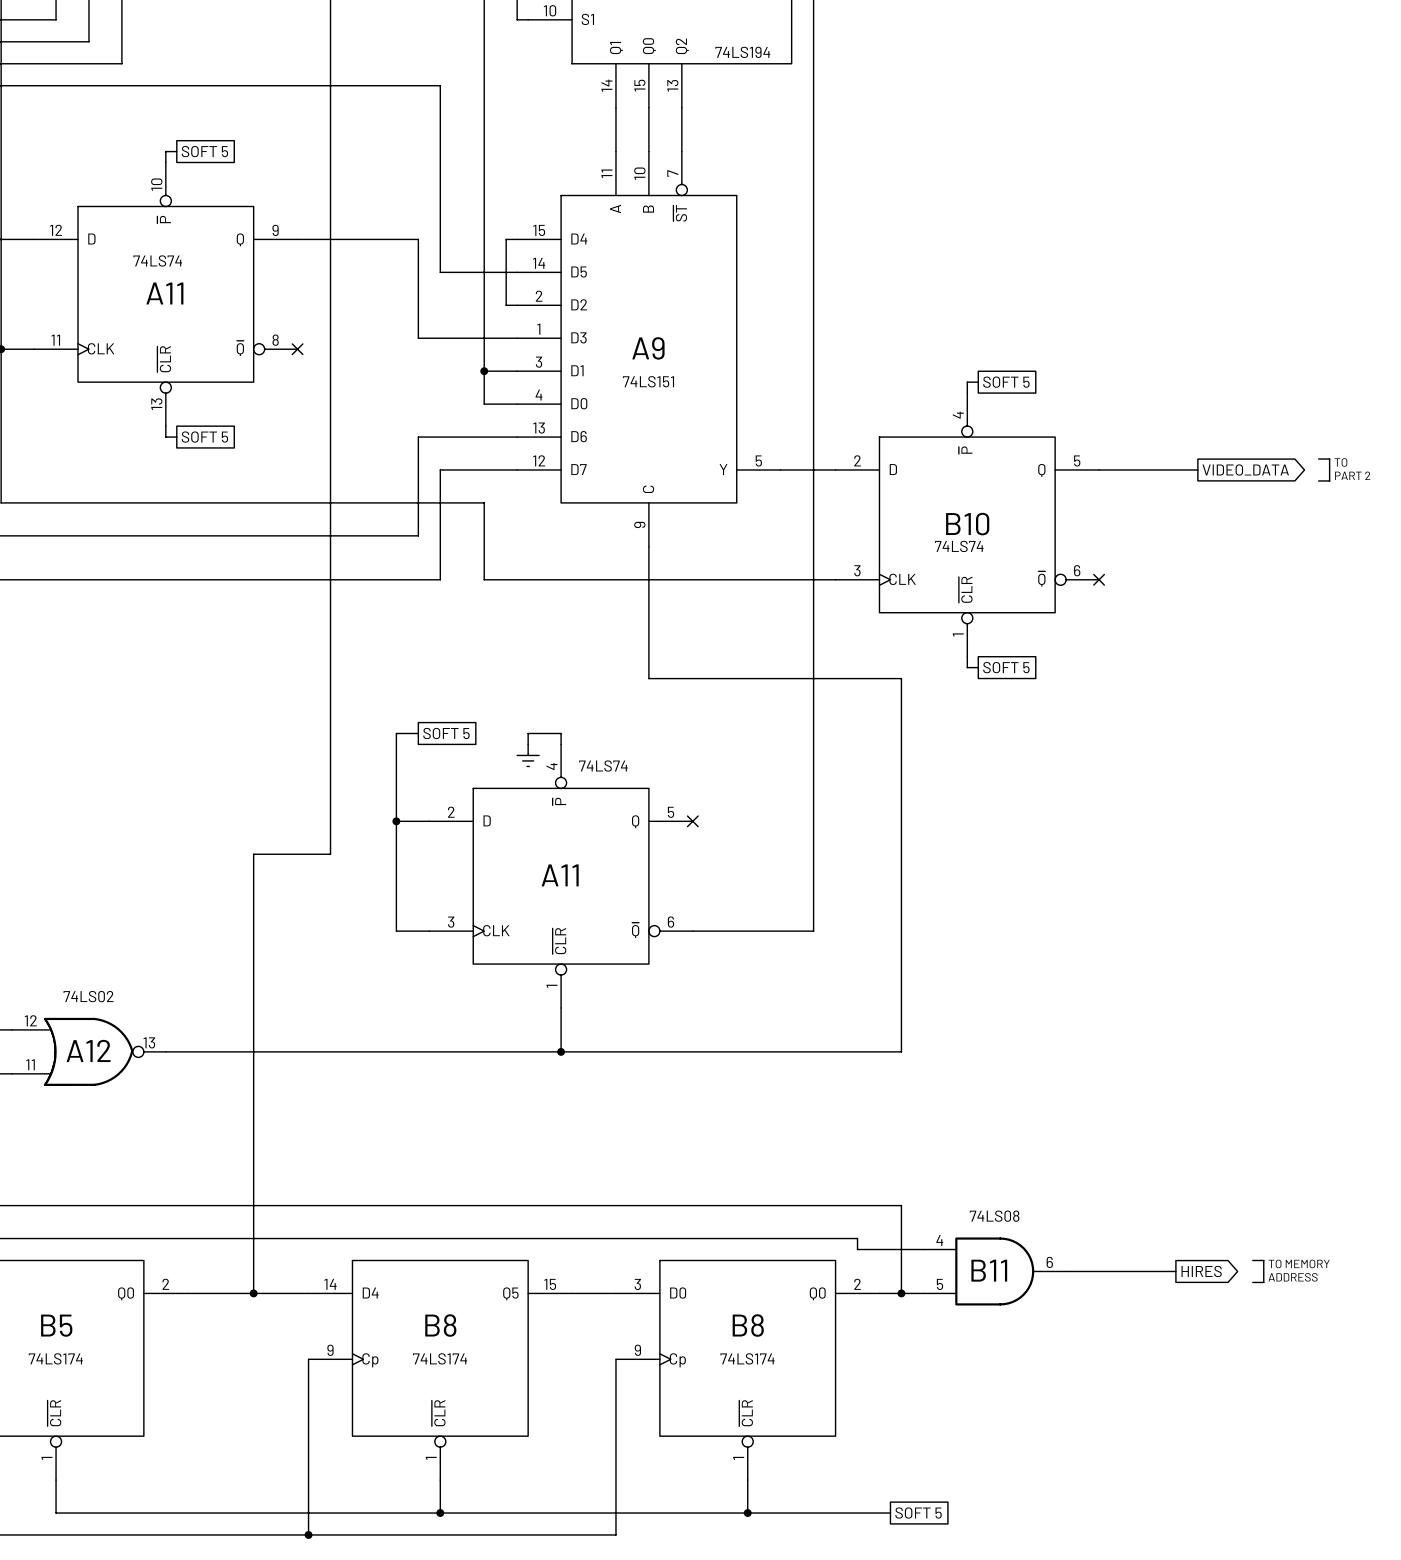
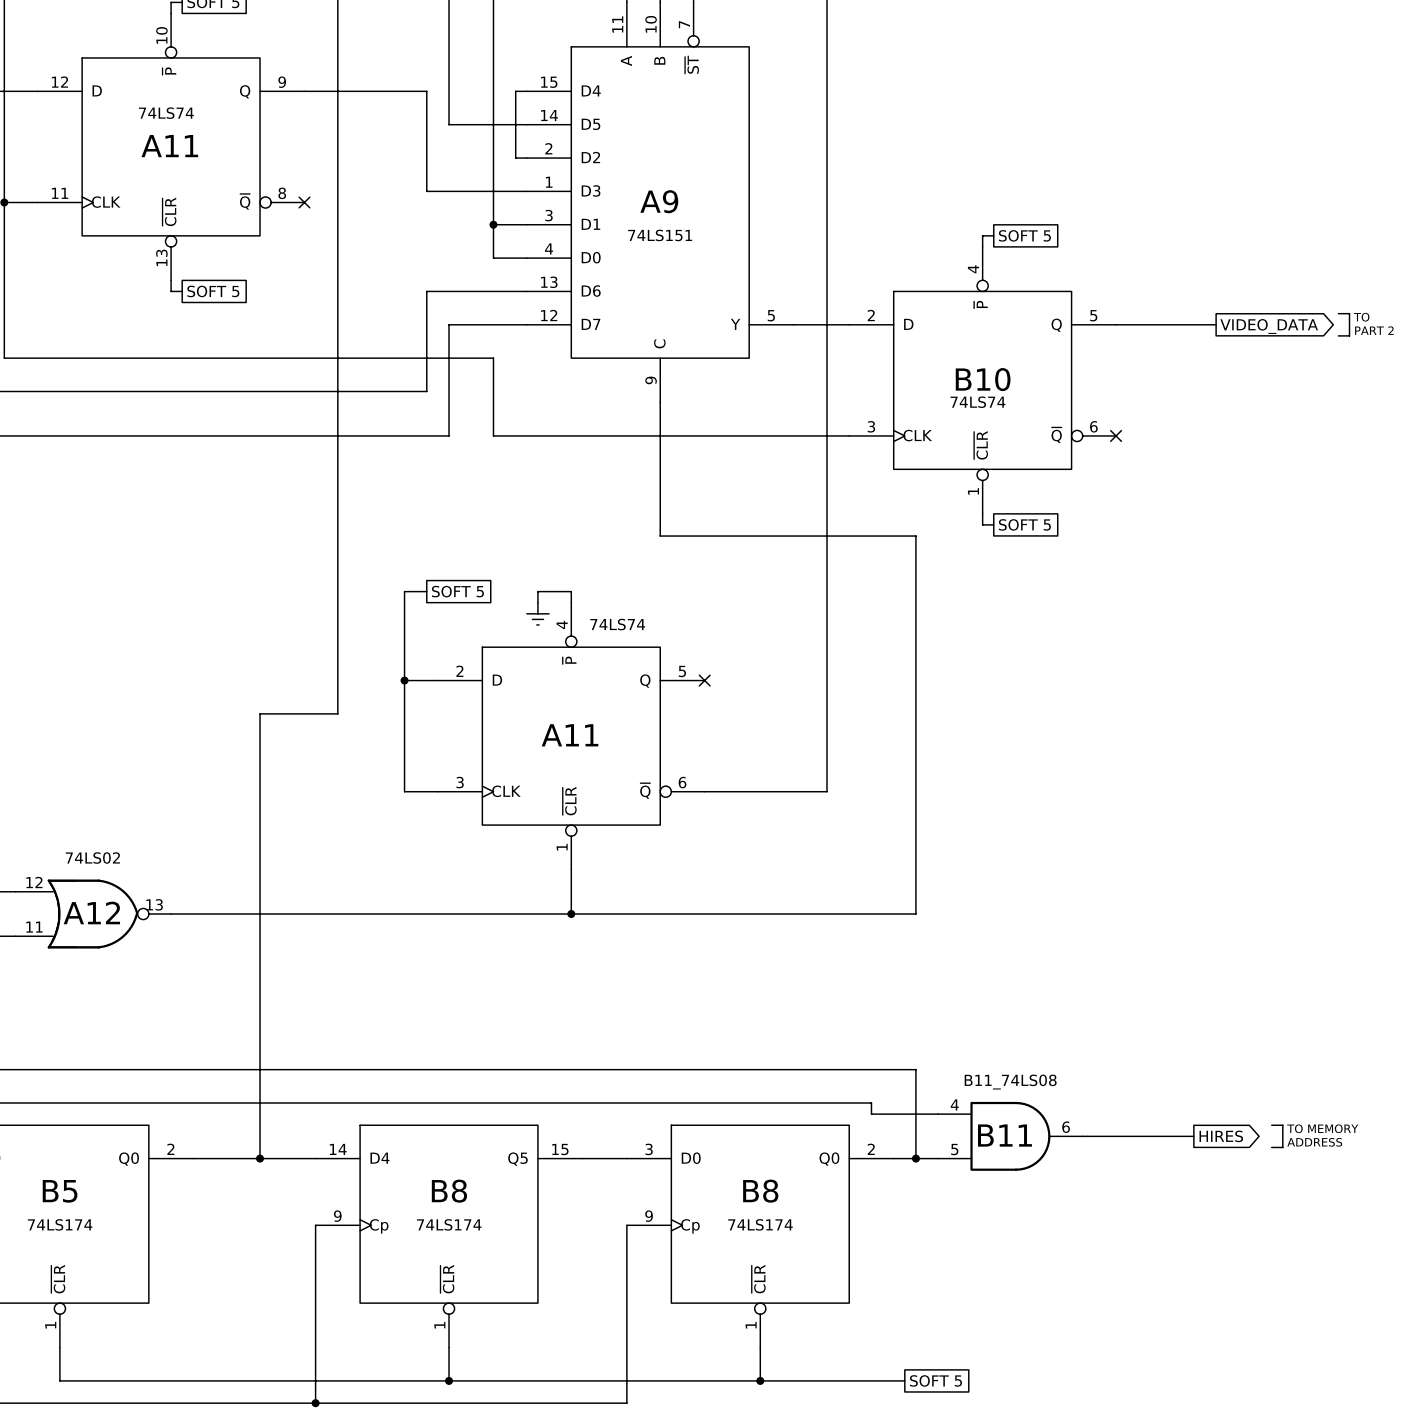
part value: 74LS08 (994, 1216) -> B11_74LS08 (1010, 1082)

